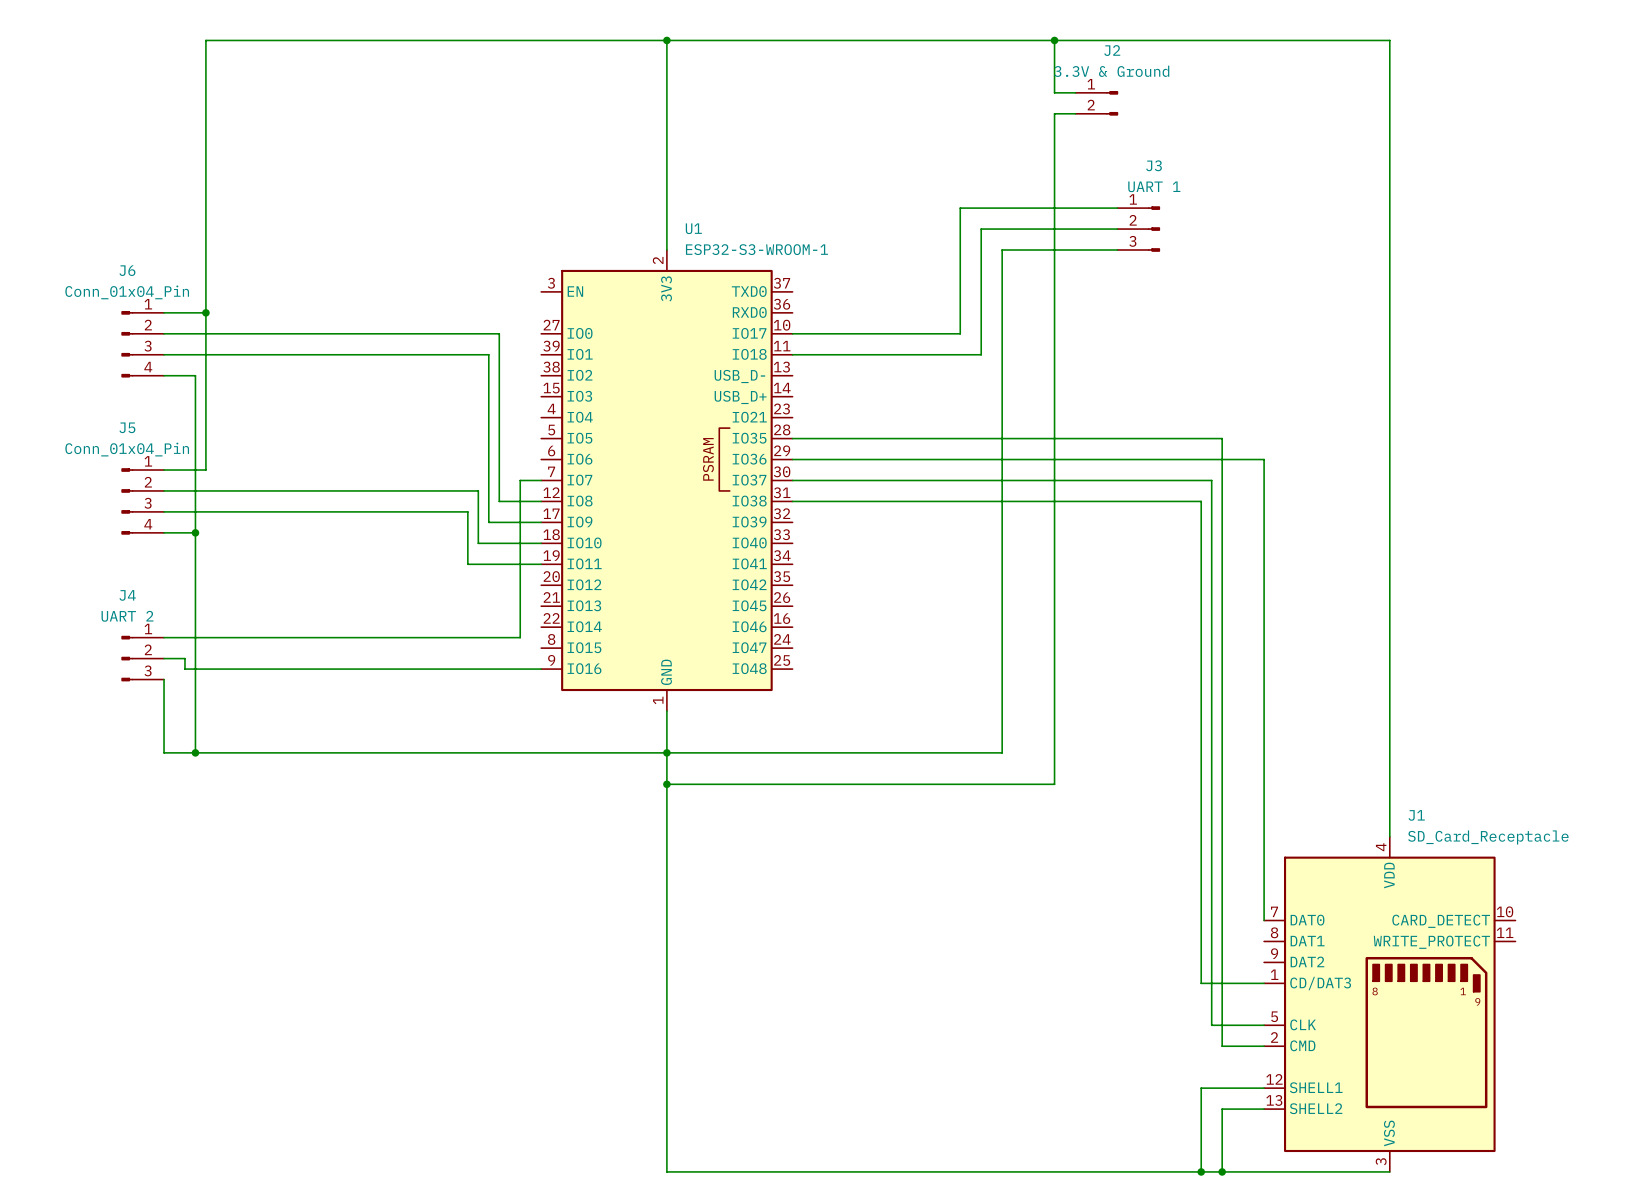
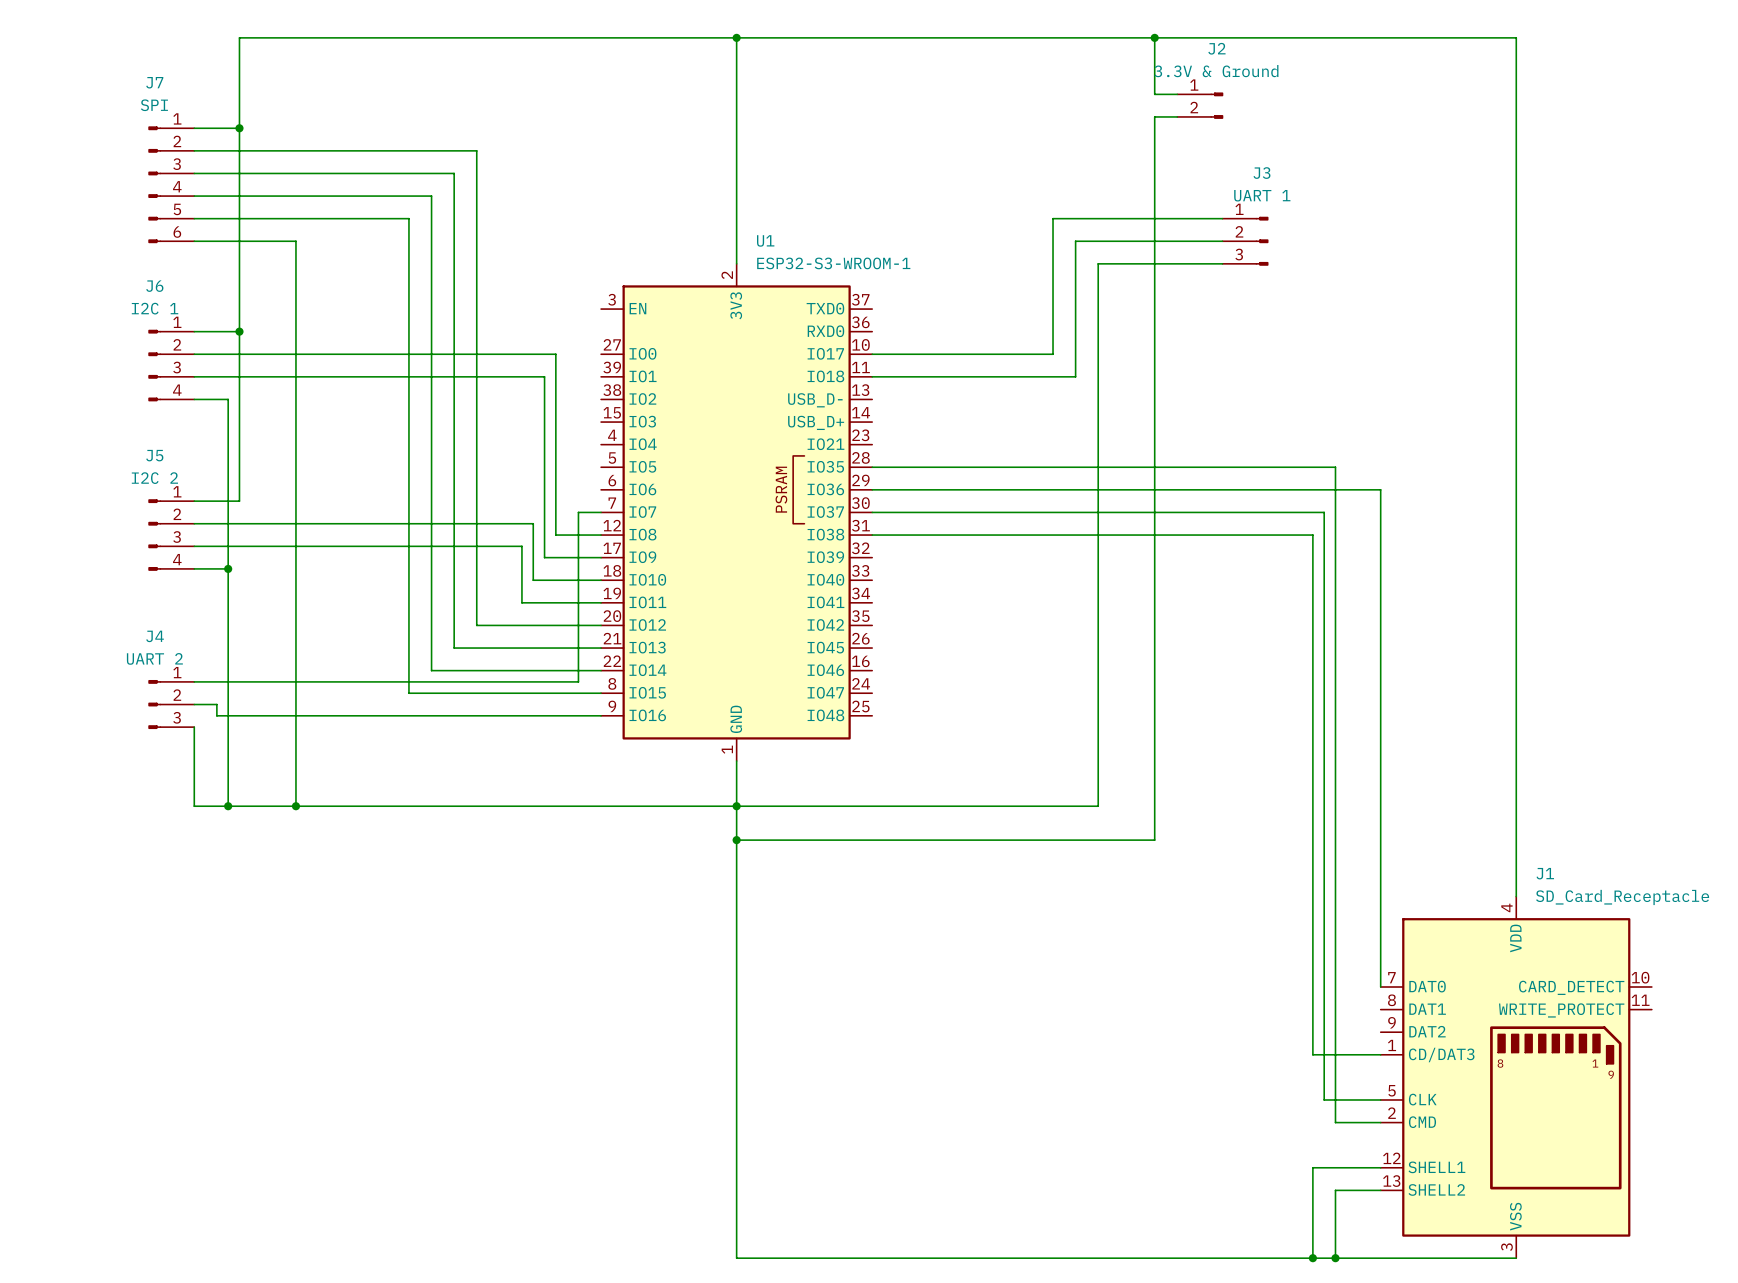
wire: none -> (194, 128) (239, 128)
junction: none -> (239, 128)
wire: none -> (194, 150) (476, 150) (476, 625) (601, 625)
wire: none -> (194, 173) (454, 173) (454, 648) (601, 648)
J7: none -> SPI (171, 184)
wire: none -> (194, 196) (431, 196) (431, 670) (601, 670)
wire: none -> (194, 218) (408, 218) (408, 693) (601, 693)
wire: none -> (194, 241) (295, 241) (295, 806)
J6 value: Conn_01x04_Pin (127, 292) -> I2C 1 (155, 308)
J5 value: Conn_01x04_Pin (127, 449) -> I2C 2 (154, 478)
junction: none -> (295, 806)

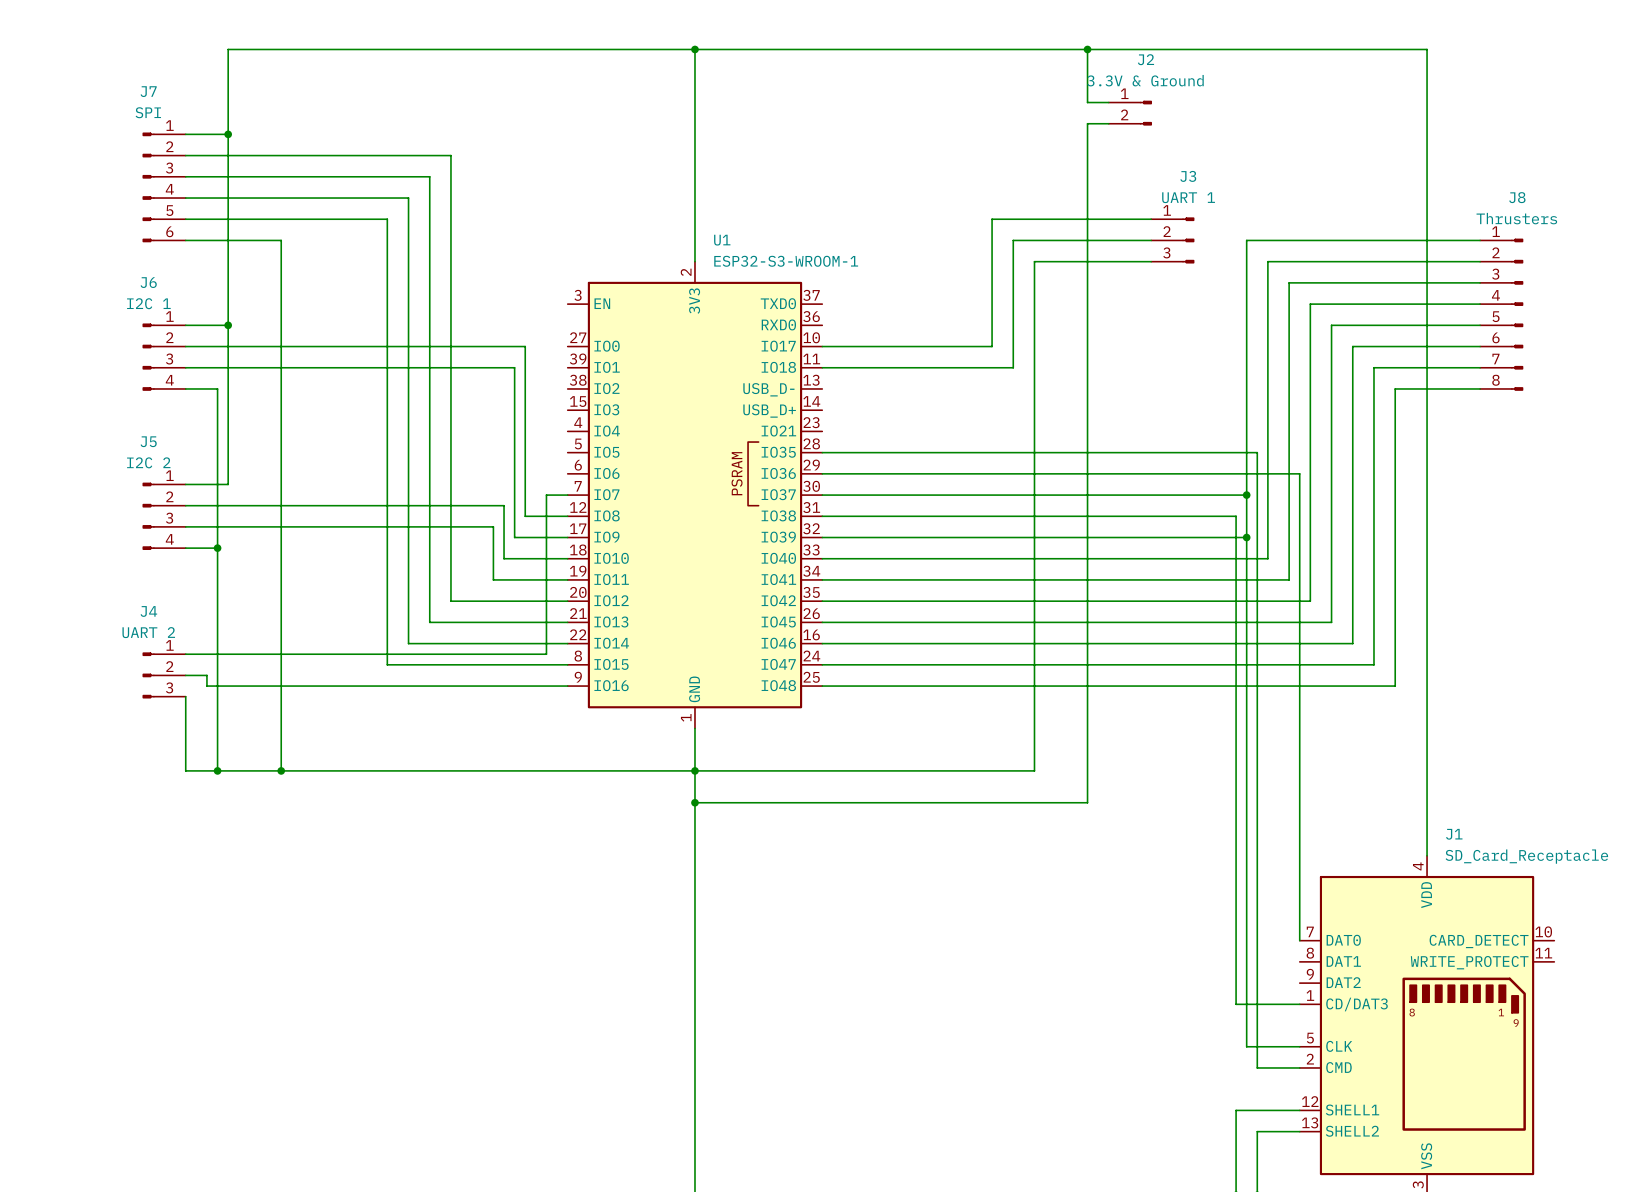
wire: none -> (1480, 240) (1246, 240) (1246, 495)
wire: none -> (1480, 261) (1267, 261) (1267, 558) (822, 558)
wire: none -> (1480, 282) (1289, 282) (1289, 579) (822, 579)
wire: none -> (1480, 304) (1310, 304) (1310, 601) (822, 601)
J8: none -> Thrusters (1501, 314)
wire: none -> (1480, 325) (1331, 325) (1331, 622) (822, 622)
wire: none -> (1480, 346) (1352, 346) (1352, 643) (822, 643)
wire: none -> (1480, 367) (1373, 367) (1373, 664) (822, 664)
wire: none -> (1480, 388) (1395, 388) (1395, 686) (822, 686)
junction: none -> (1246, 495)
wire: none -> (822, 537) (1246, 537)
junction: none -> (1246, 537)

